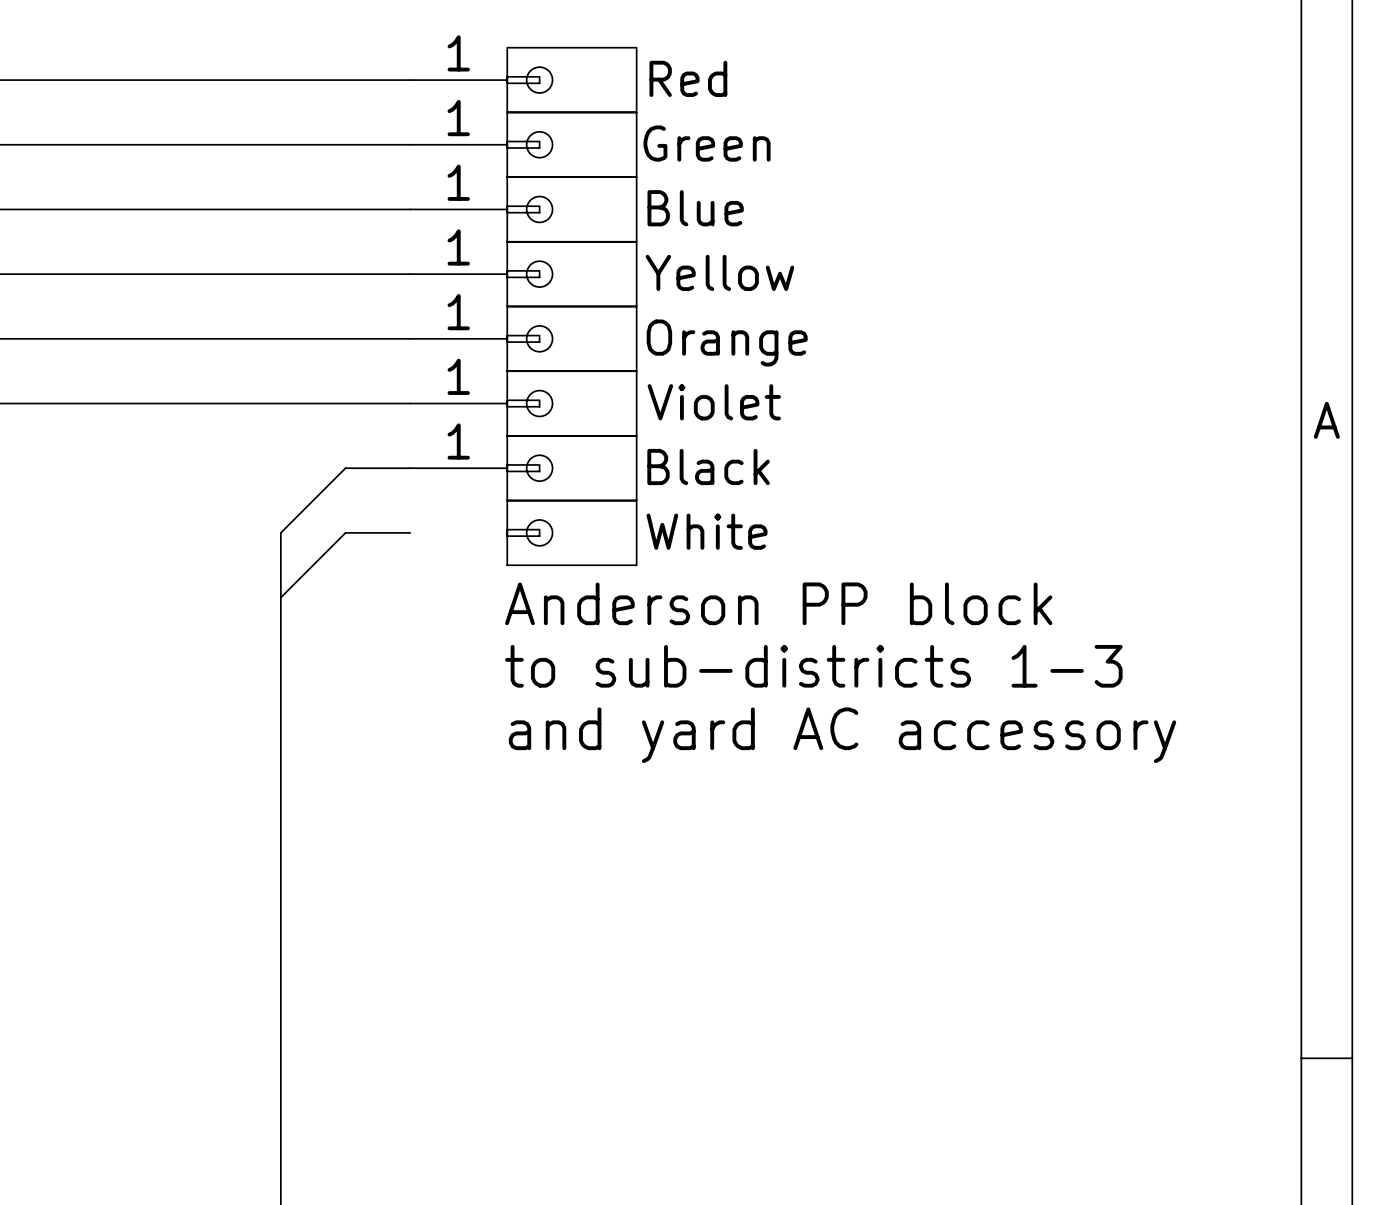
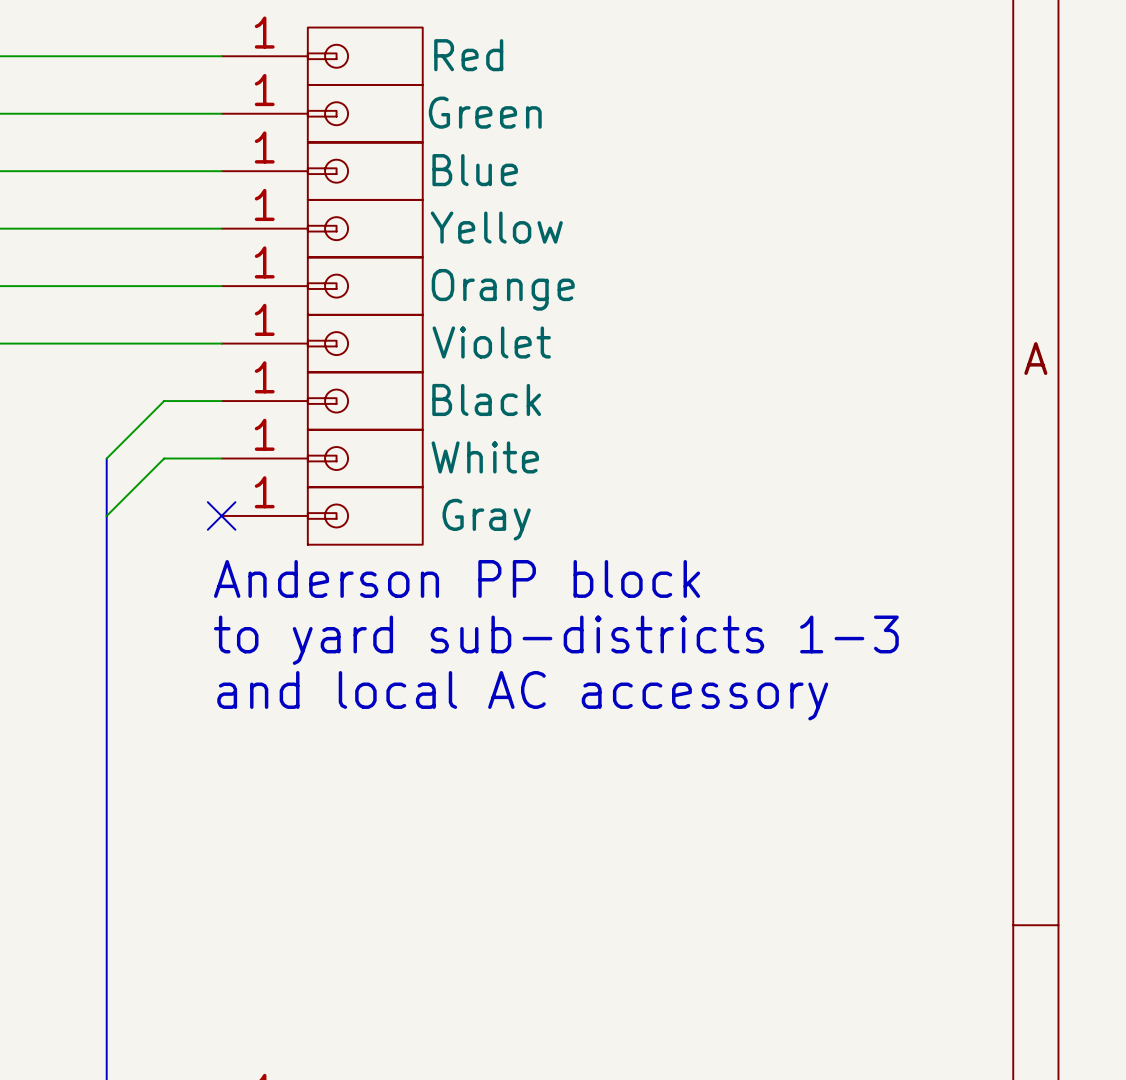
part: none -> White (322, 458)
part: White (571, 532) -> none
no-connect mark: none -> (221, 515)
part: none -> Gray (322, 515)
text position: Anderson PP block (778, 603) -> Anderson PP block (457, 578)
text: to sub-districts 1-3 (813, 666) -> to yard sub-districts 1-3 (556, 640)
text: and yard AC accessory (842, 735) -> and local AC accessory (522, 695)

